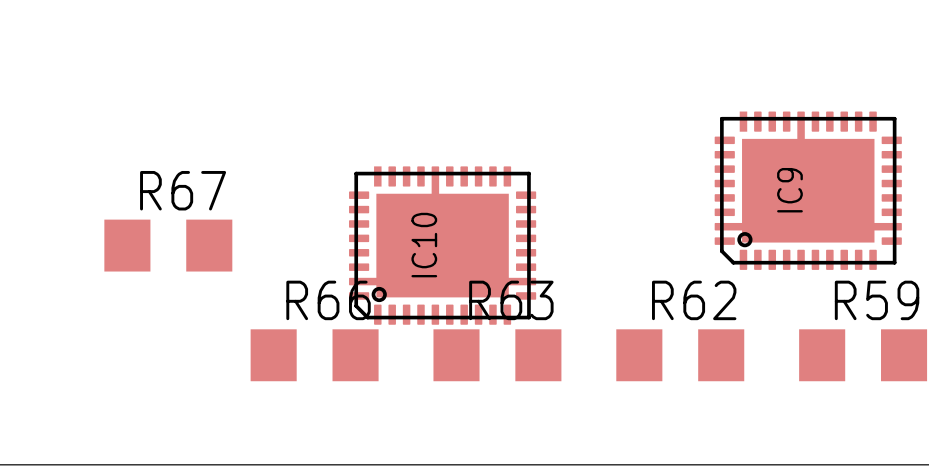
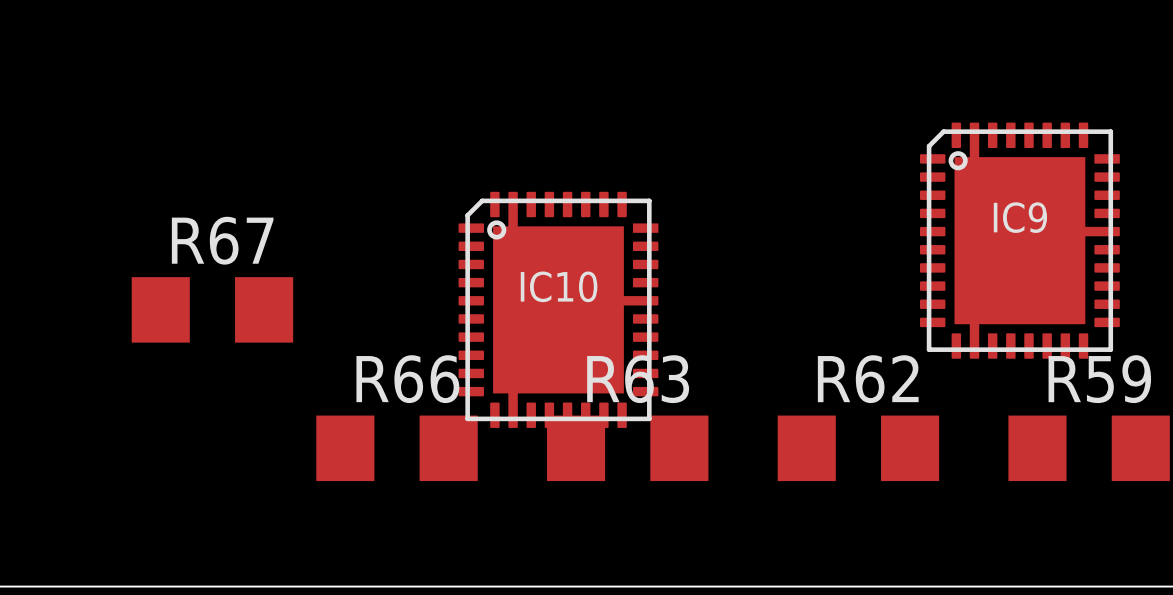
IC9 rotation: 0° (808, 190) -> 90° clockwise (1019, 240)
IC10 rotation: 0° (442, 245) -> 90° clockwise (558, 309)

